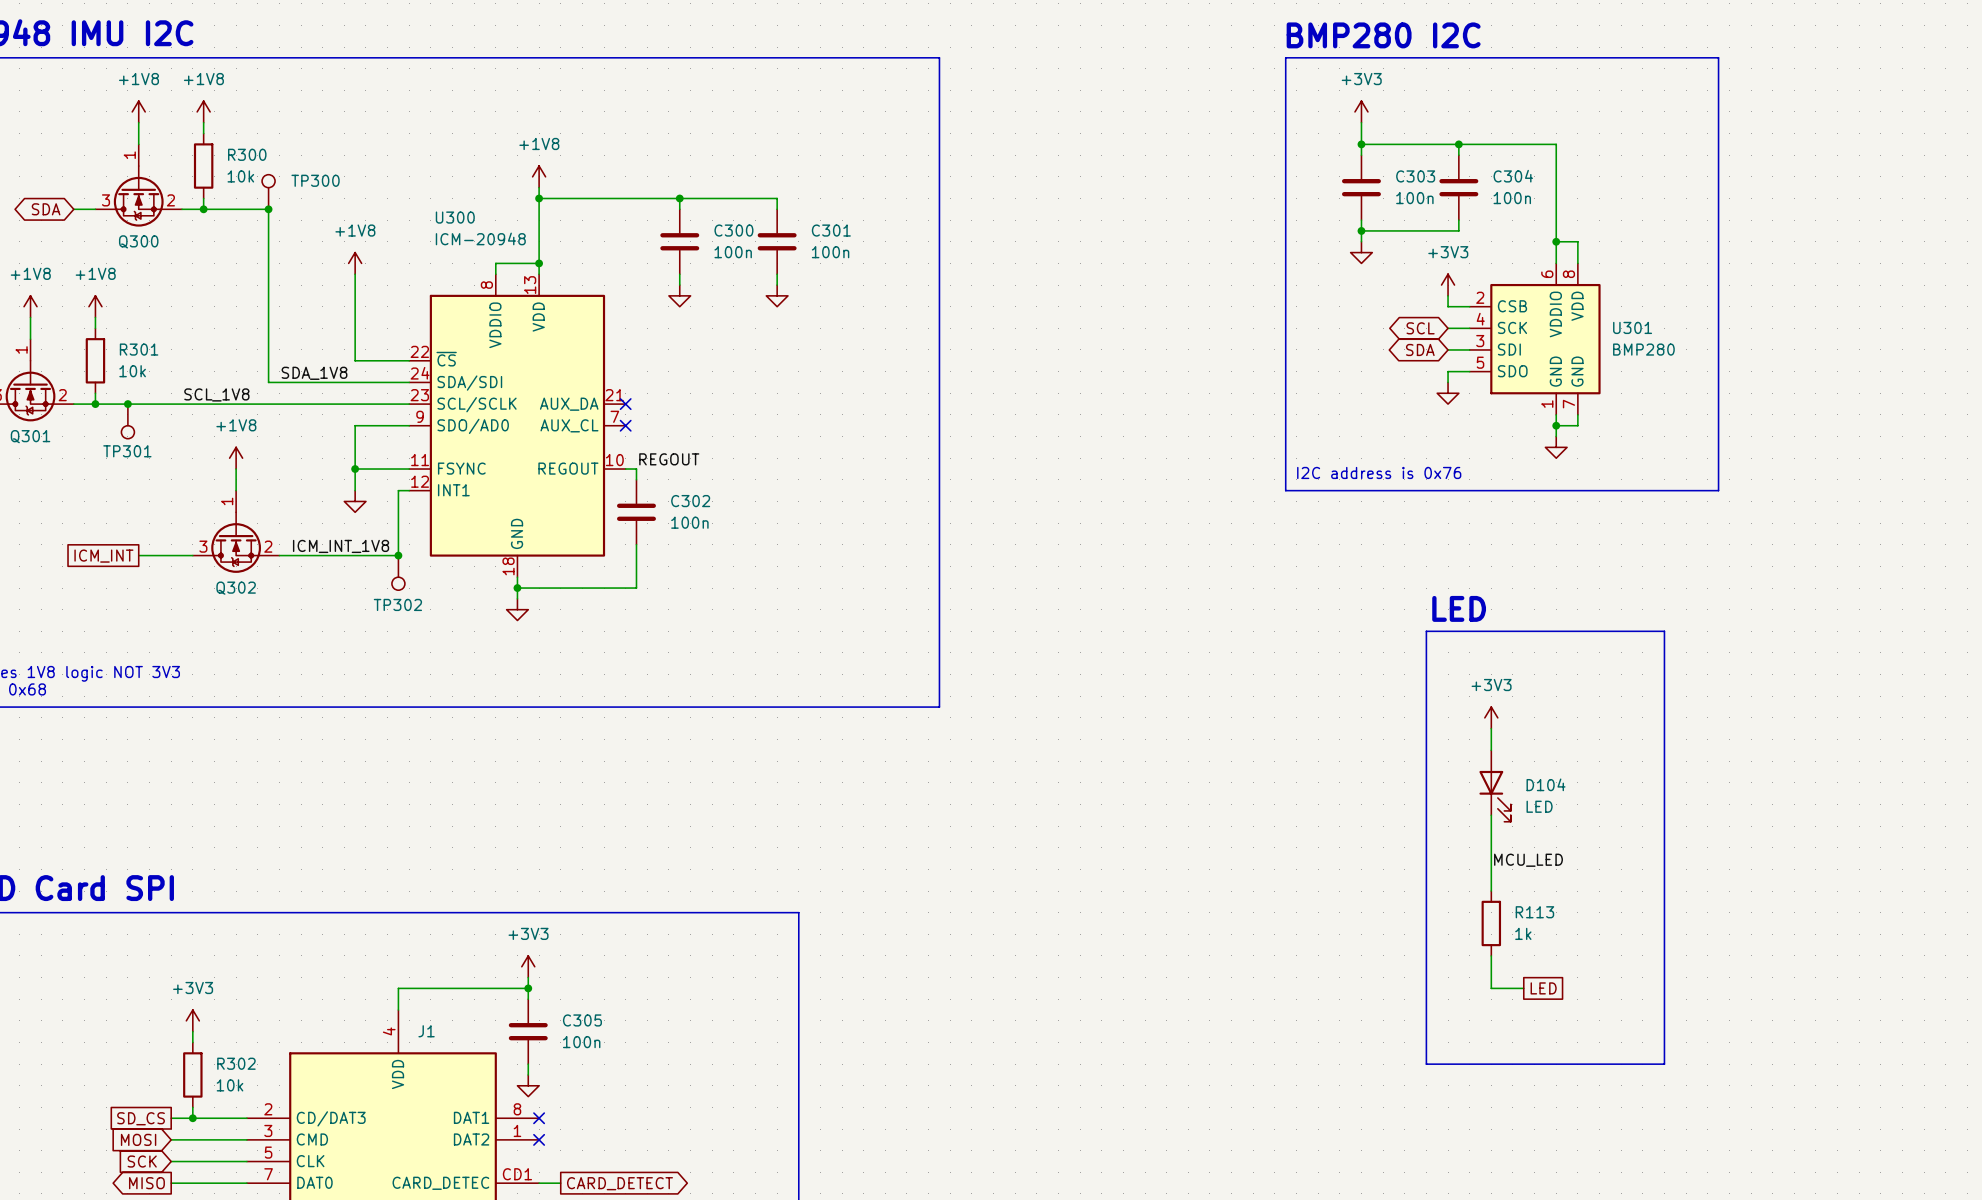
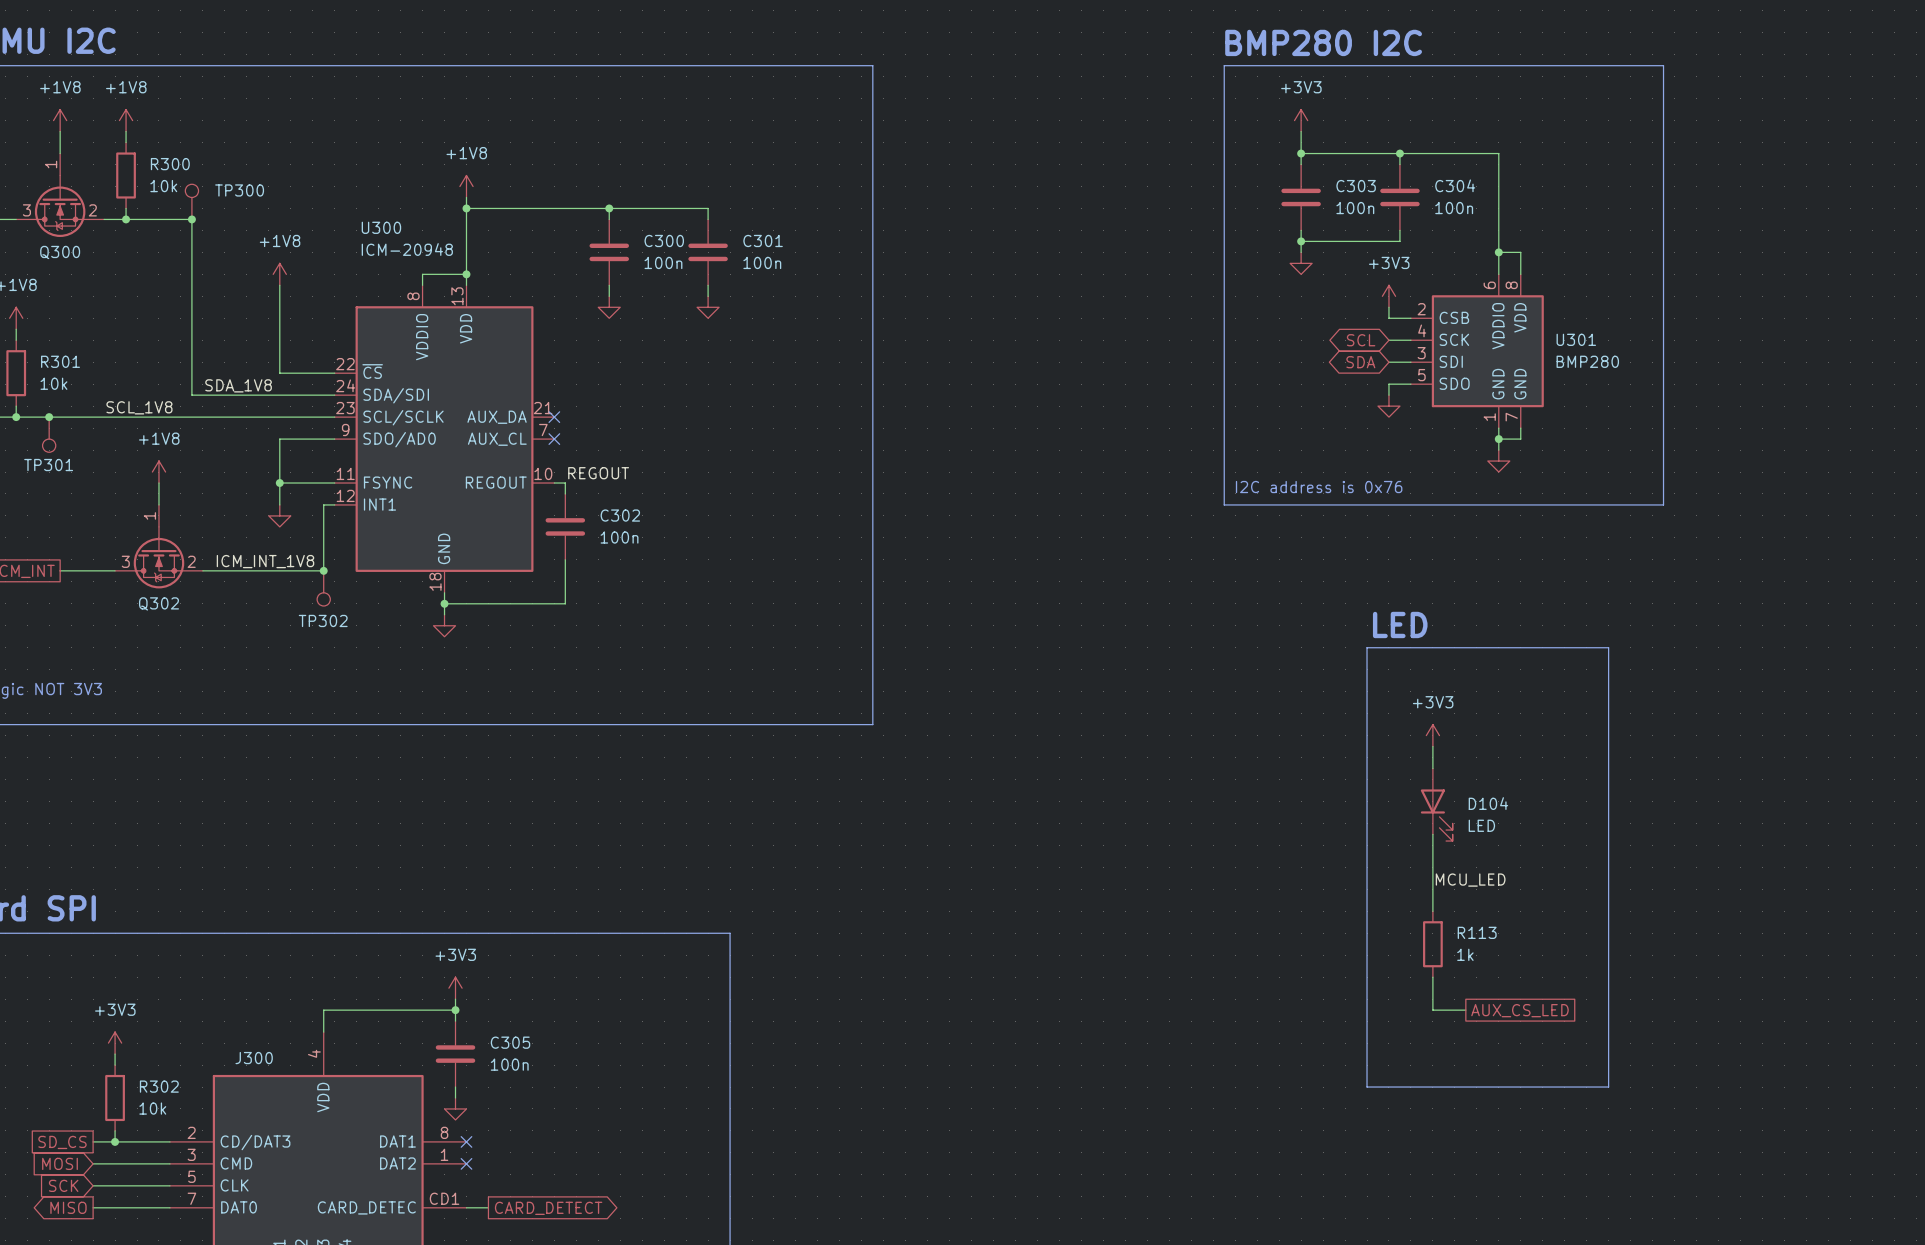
global label: LED (1543, 988) -> AUX_CS_LED (1519, 1010)
J1 name: J1 (426, 1031) -> J300 (254, 1058)

